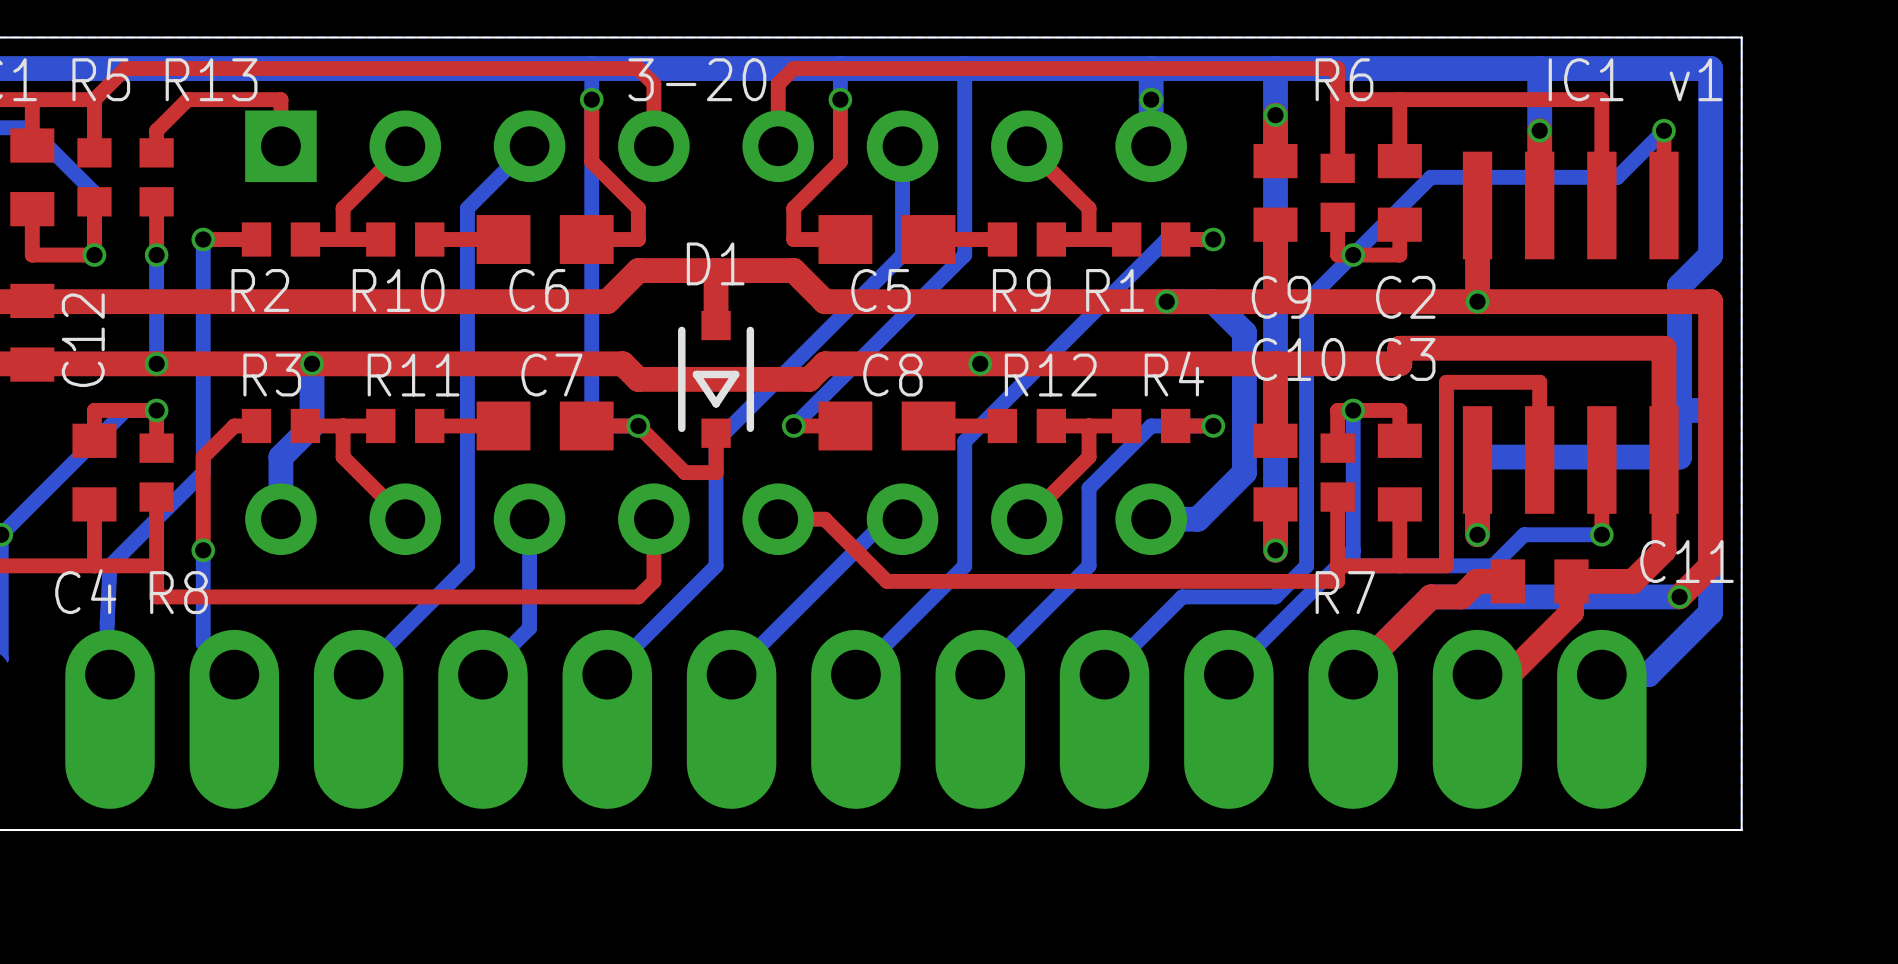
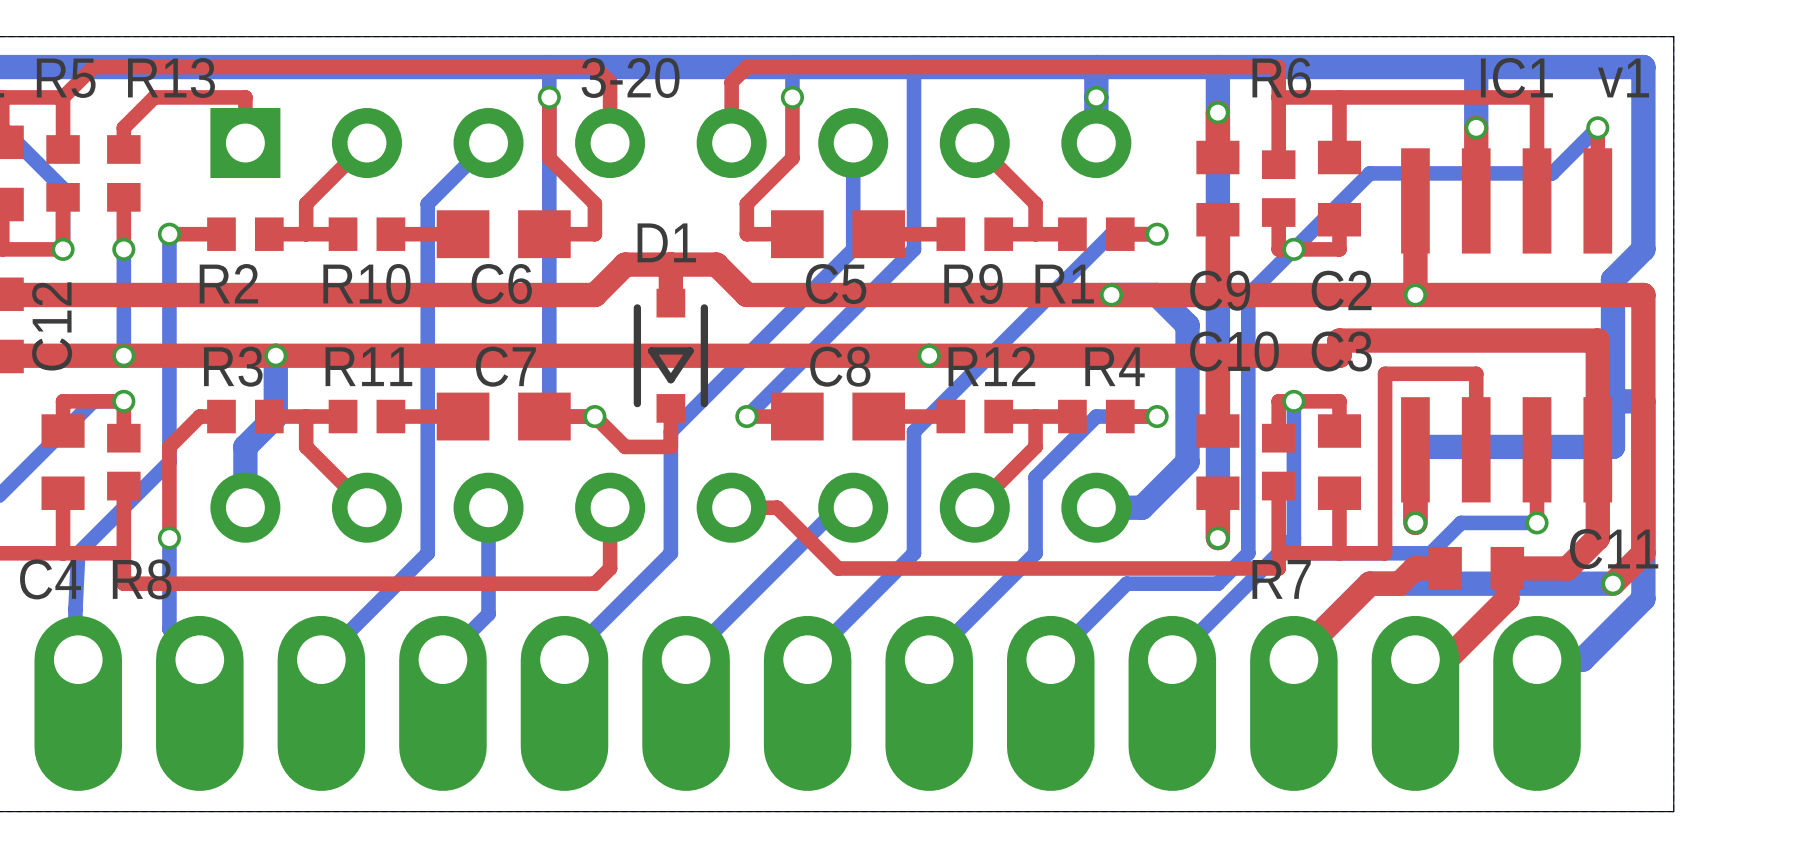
top track: (669, 270) (638, 270) (607, 301) -> (625, 264) (594, 294) (564, 294)
top track: (762, 270) (793, 270) (824, 301) -> (716, 264) (746, 294) (777, 294)
top track: (622, 363) (638, 379) (809, 379) (824, 363) -> (579, 355) (777, 355)
D1 position: (716, 379) -> (670, 355)
top track: (669, 457) (684, 472) (716, 472) (716, 457) -> (625, 446) (670, 446)

